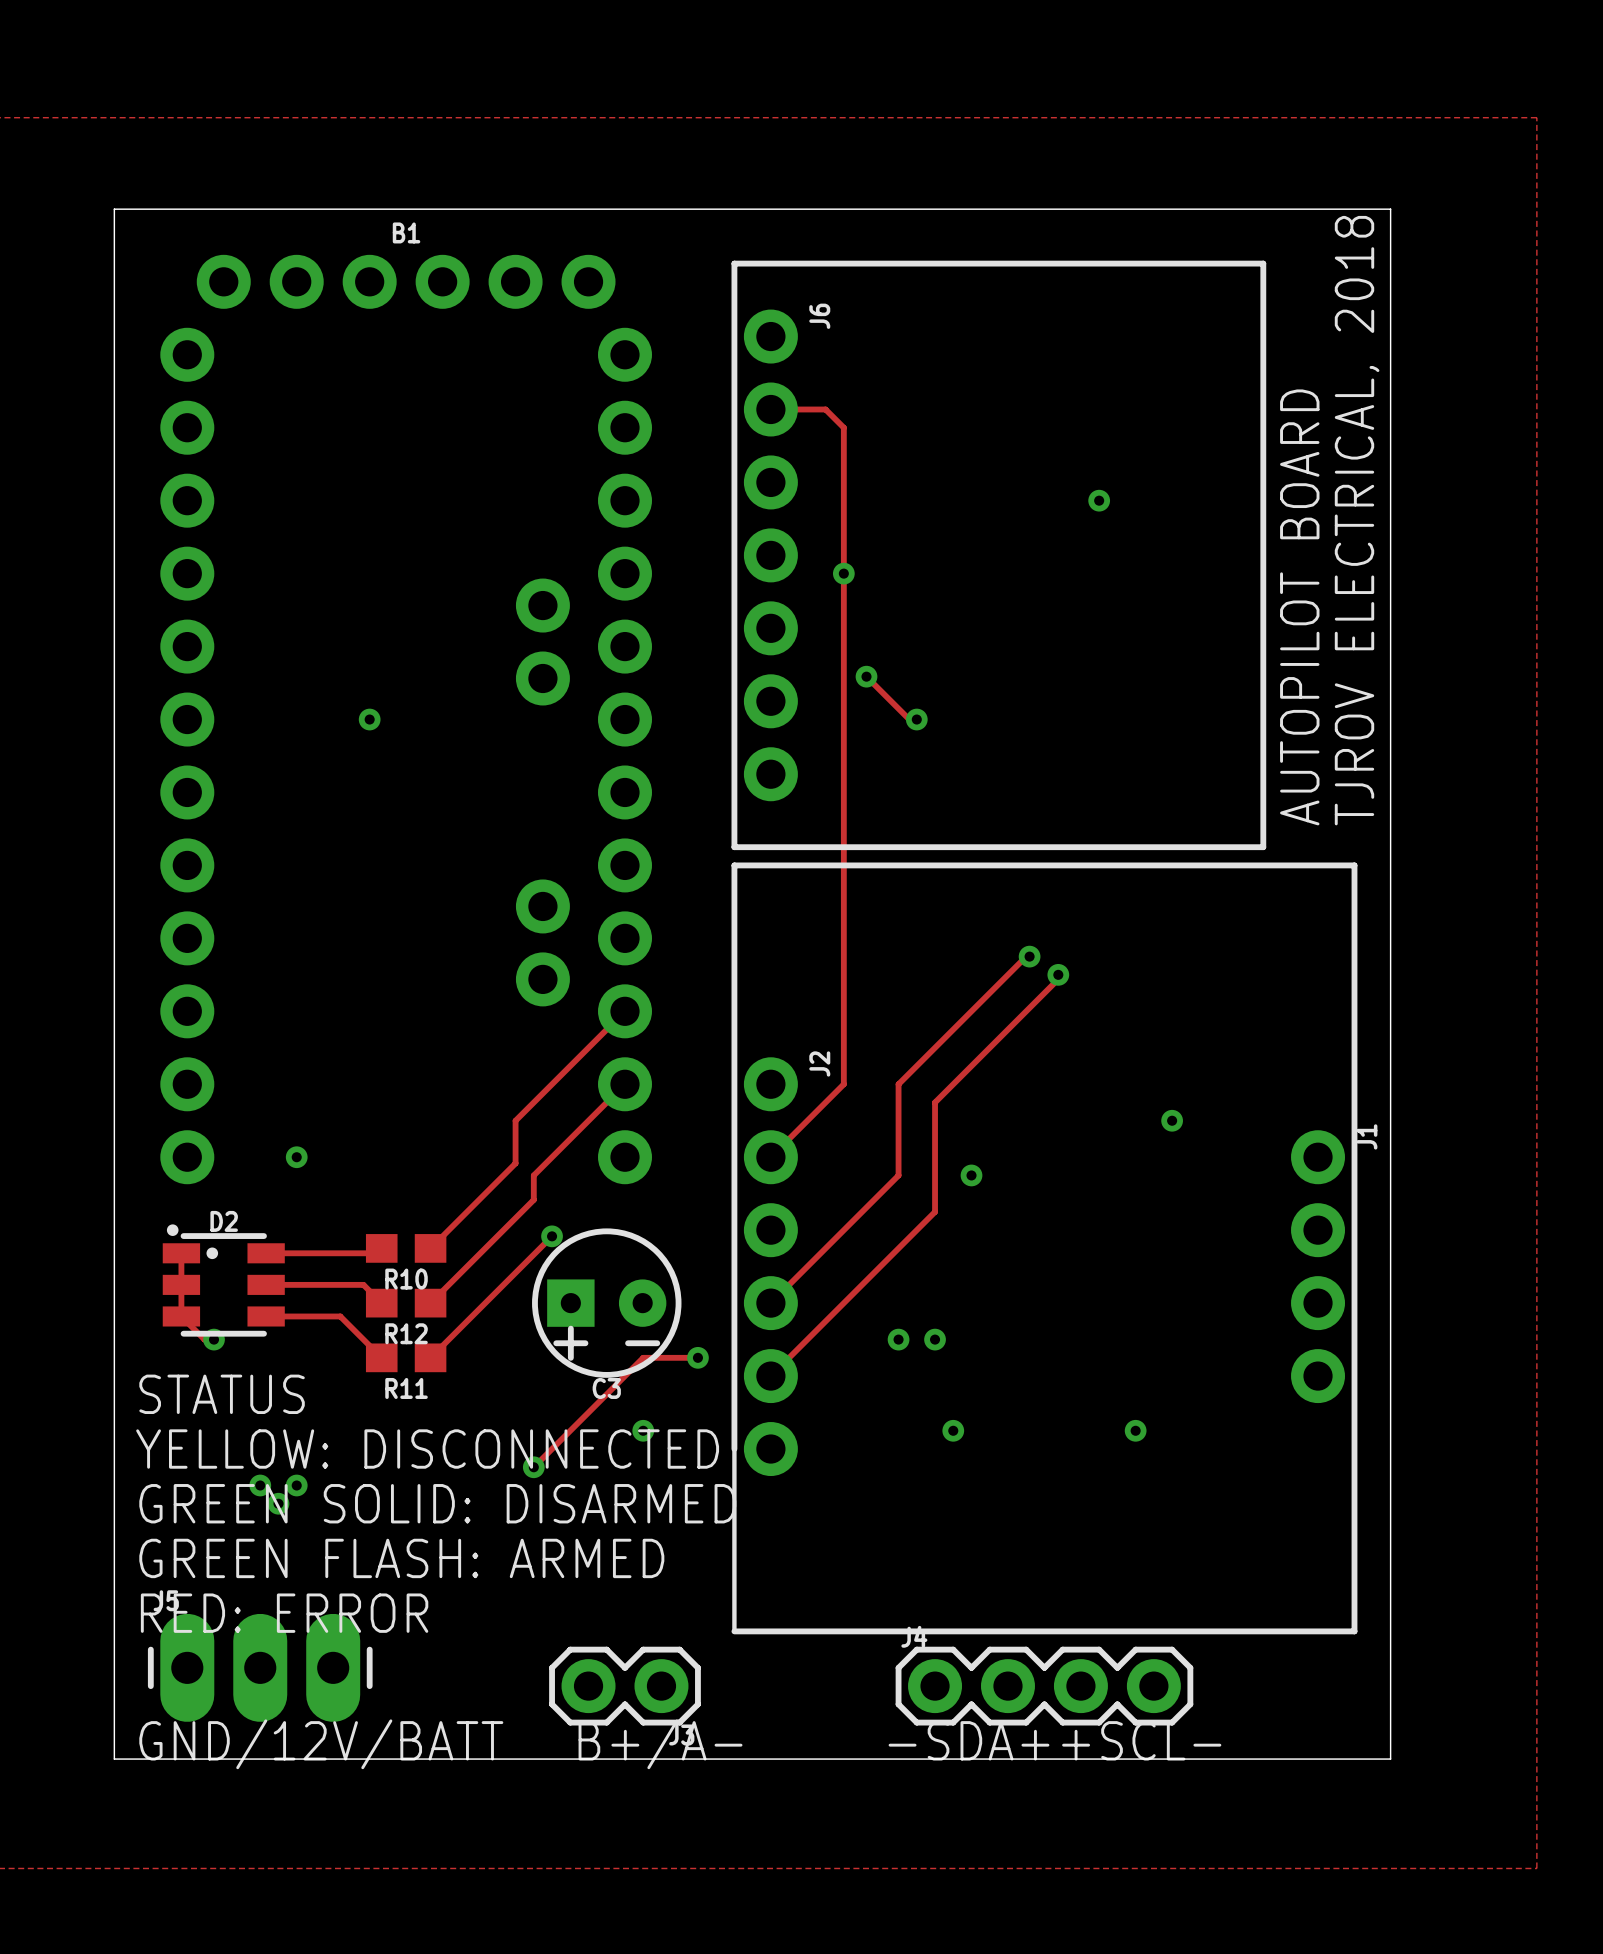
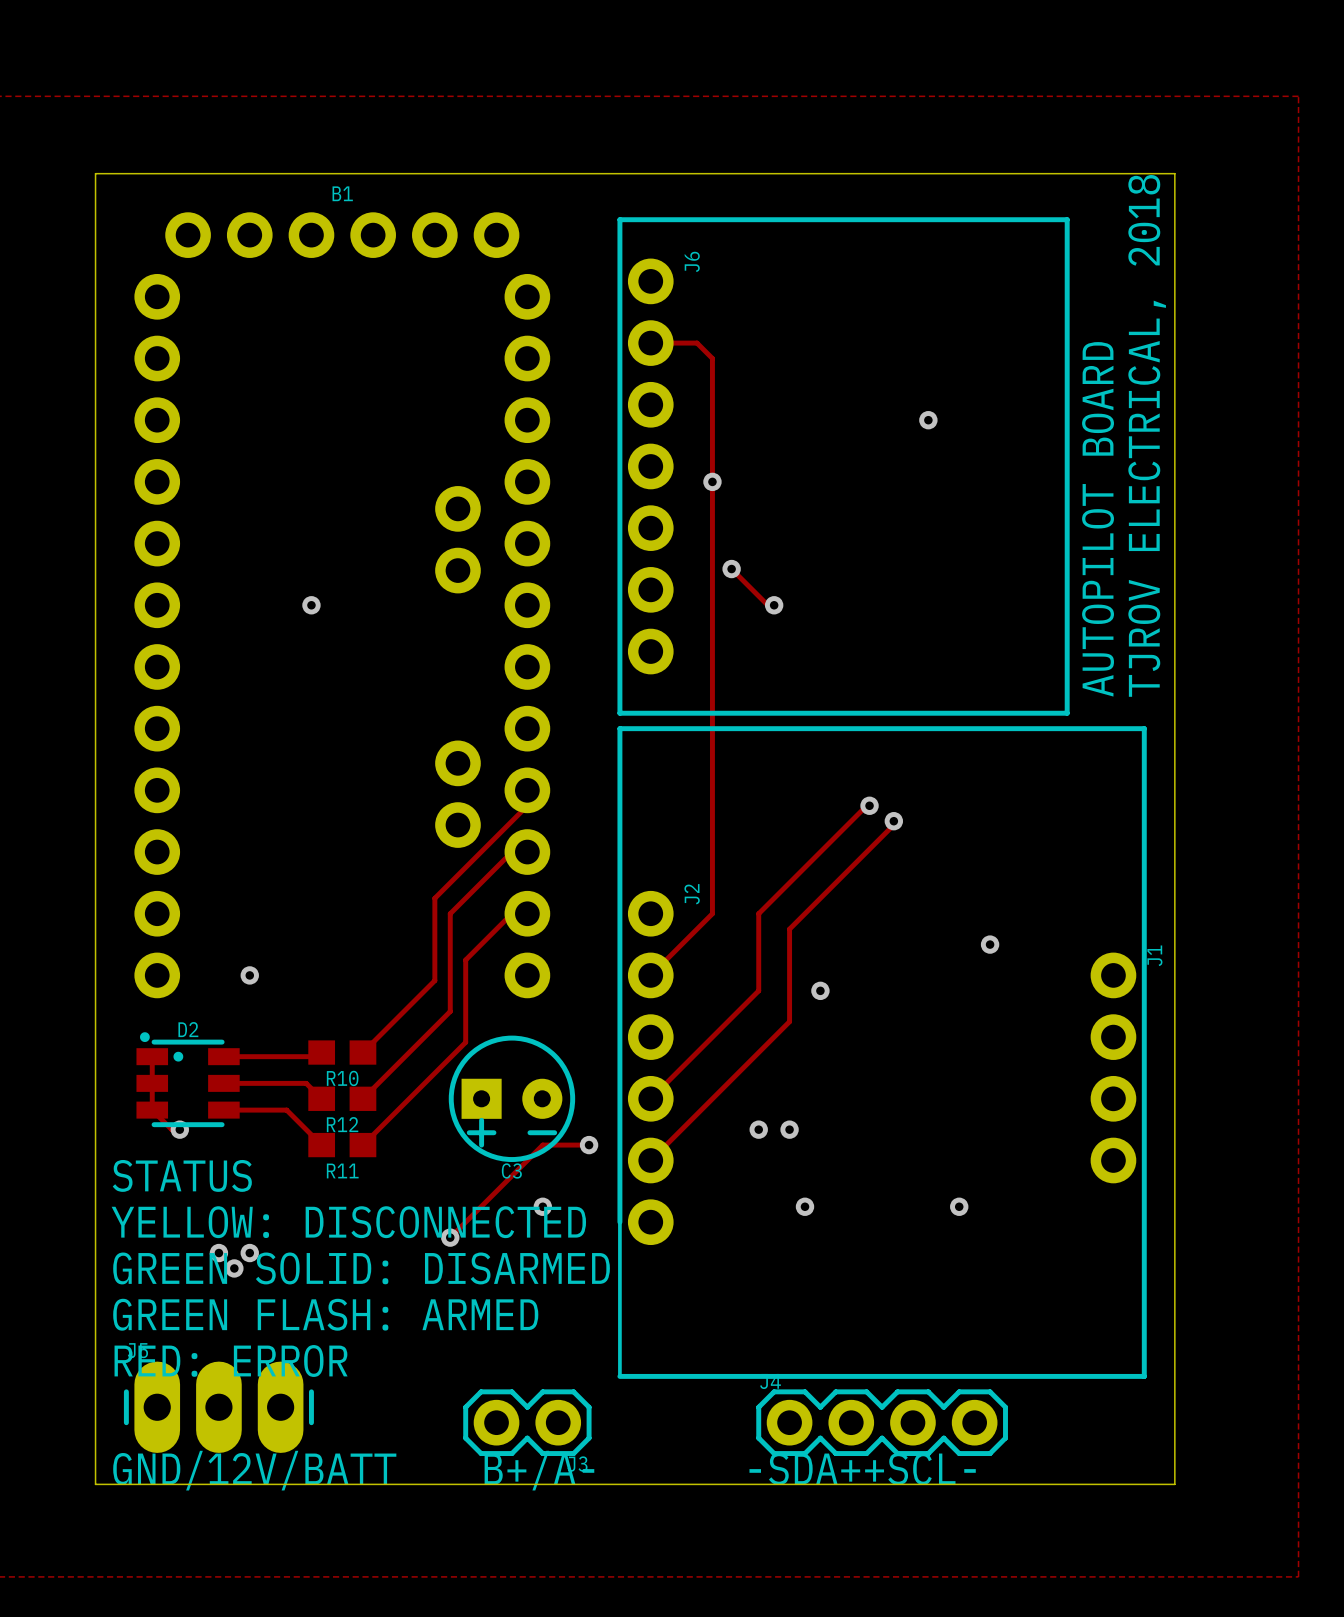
track: none -> (527, 790) (527, 805) (434, 898) (434, 944)
track: (625, 1011) (515, 1120) -> (527, 852) (511, 852) (450, 913) (450, 990)
track: (625, 1084) (533, 1175) -> (527, 913) (511, 913) (465, 960) (465, 1042)
via: (552, 1236) -> none

